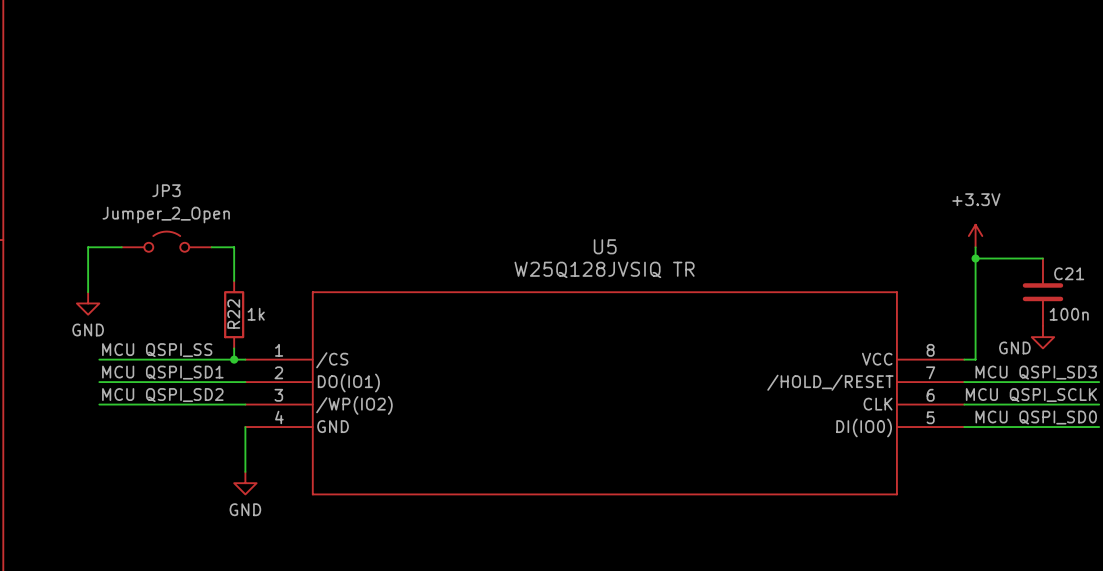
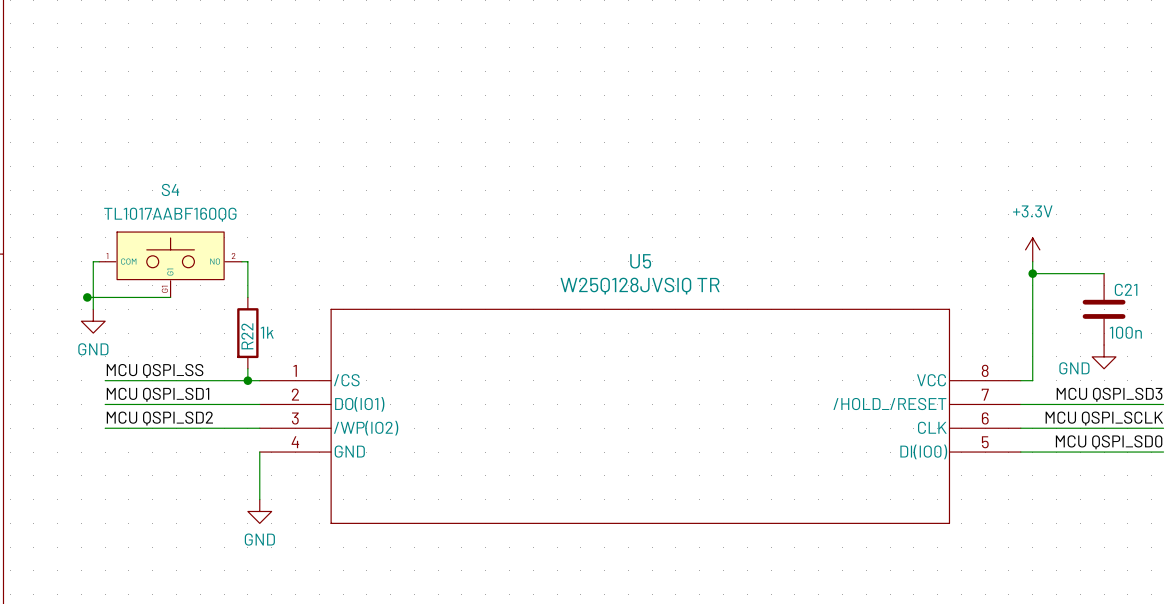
JP3: Jumper_2_Open (166, 241) -> none
S4: none -> TL1017AABF160QG (170, 264)
wire: none -> (87, 297) (170, 297)
junction: none -> (87, 297)

